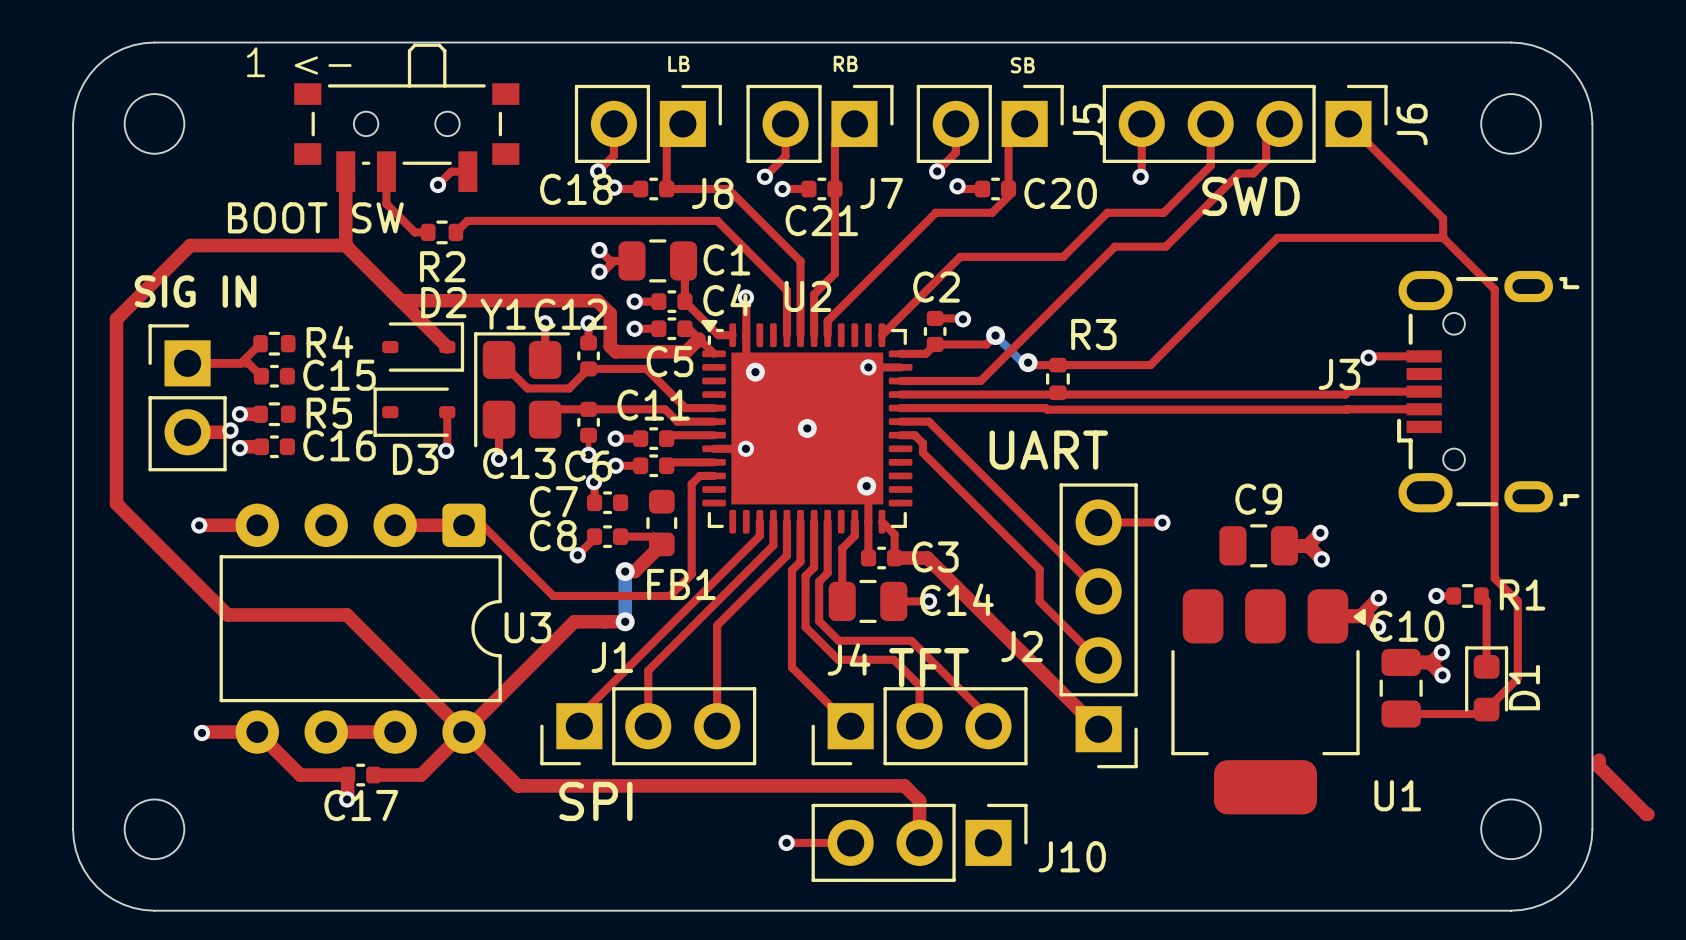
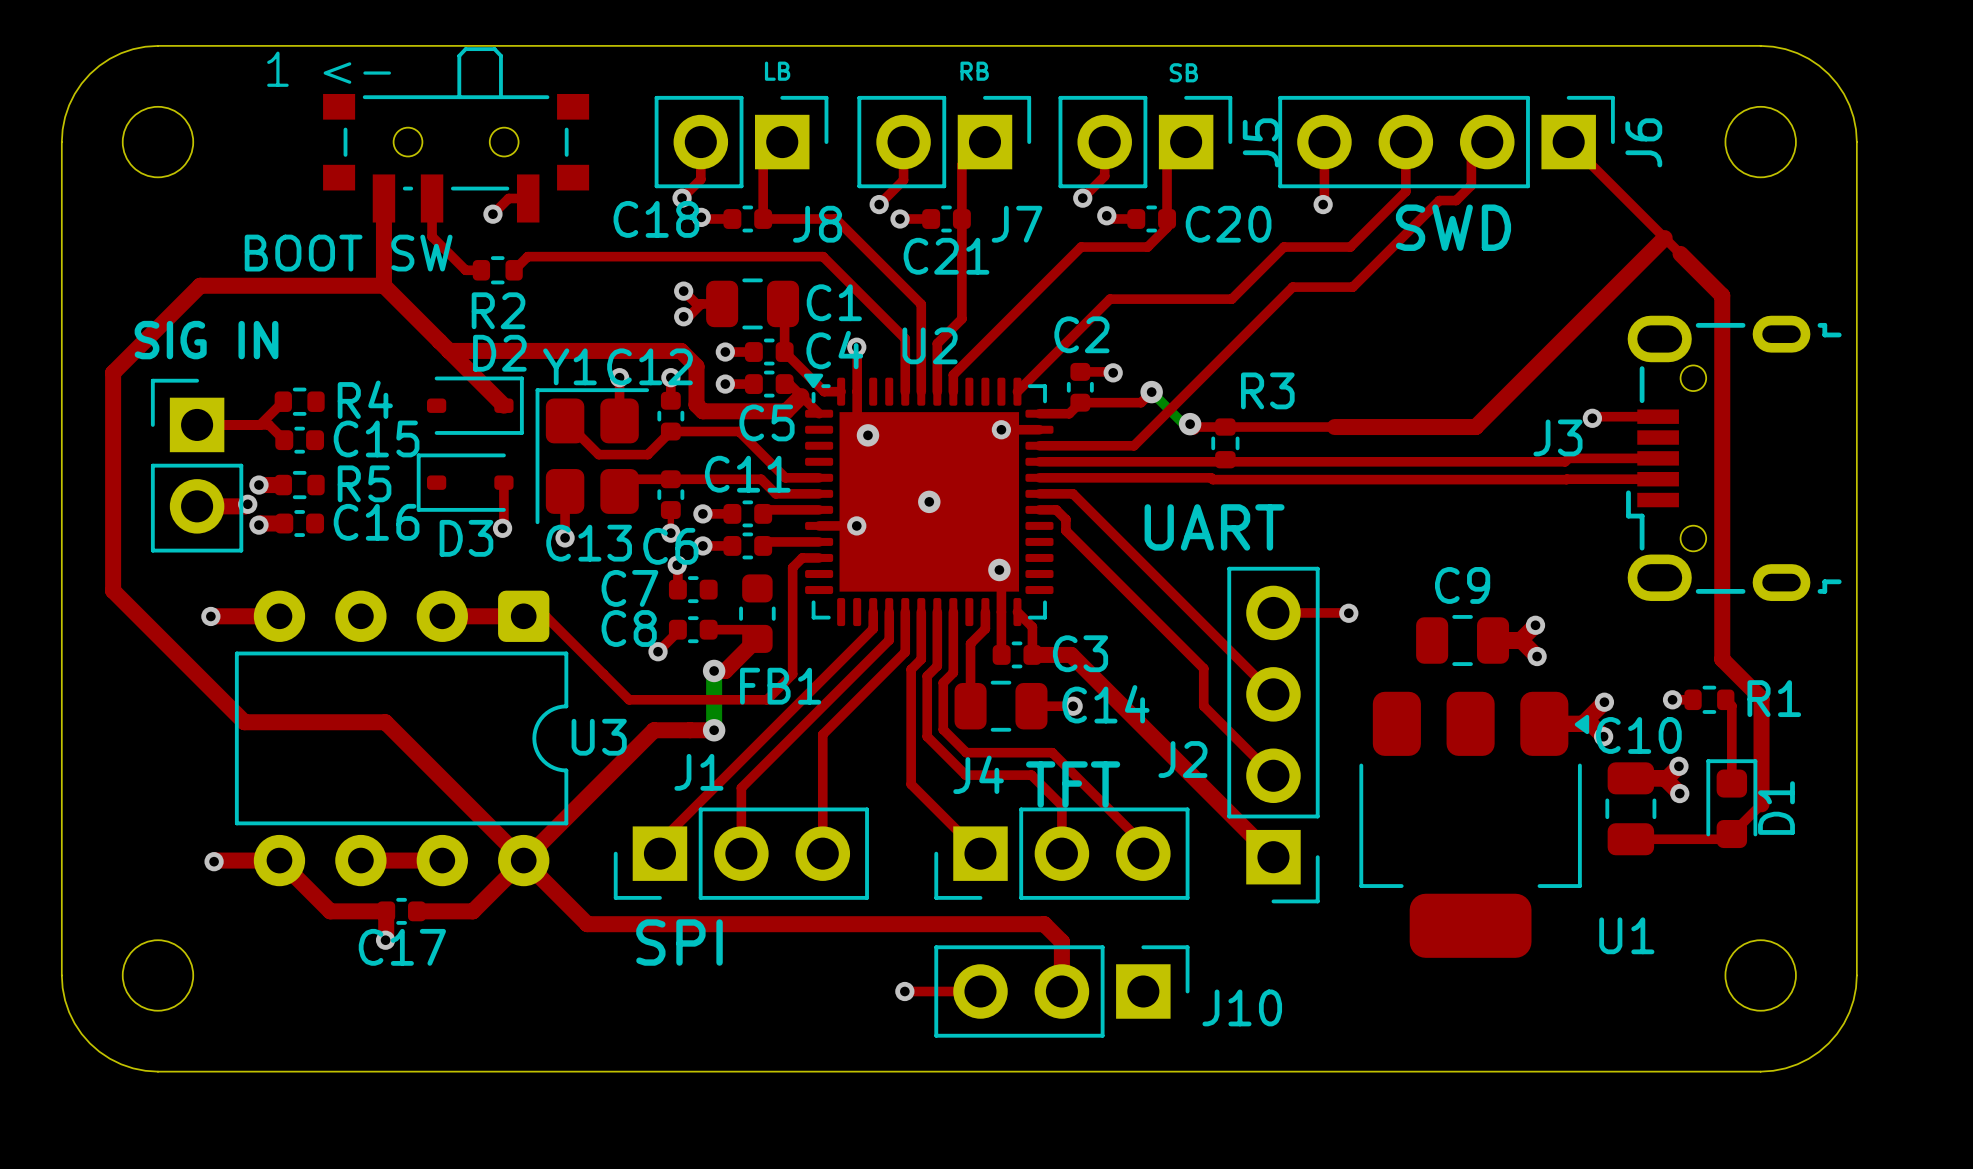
top track: (1443, 218) (1443, 237) -> none
top track: (1443, 237) (1494, 289) (1494, 578) (1517, 601) (1517, 678) (1511, 684) -> (1680, 253) (1722, 295) (1722, 659) (1761, 698) (1761, 804)
top track: (1443, 237) (1277, 237) (1150, 365) -> (1664, 238) (1475, 427) (1334, 427)
top track: (1599, 760) (1599, 766) (1648, 814) -> none

